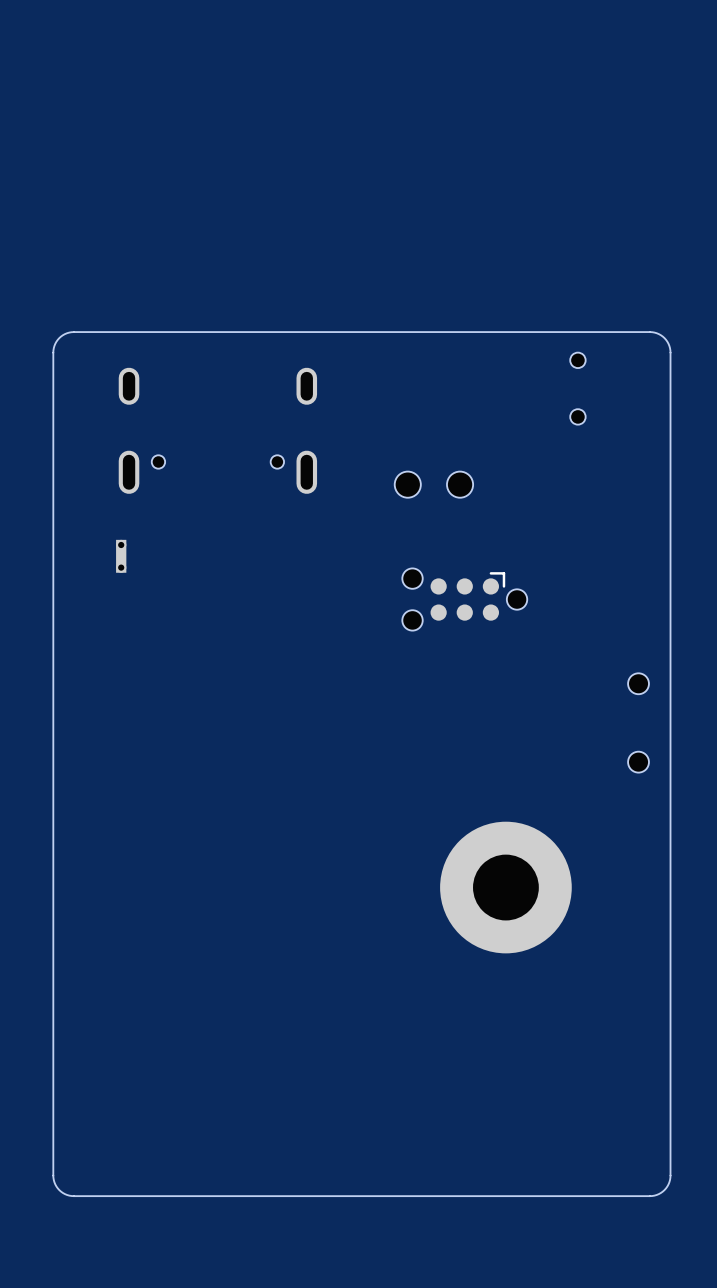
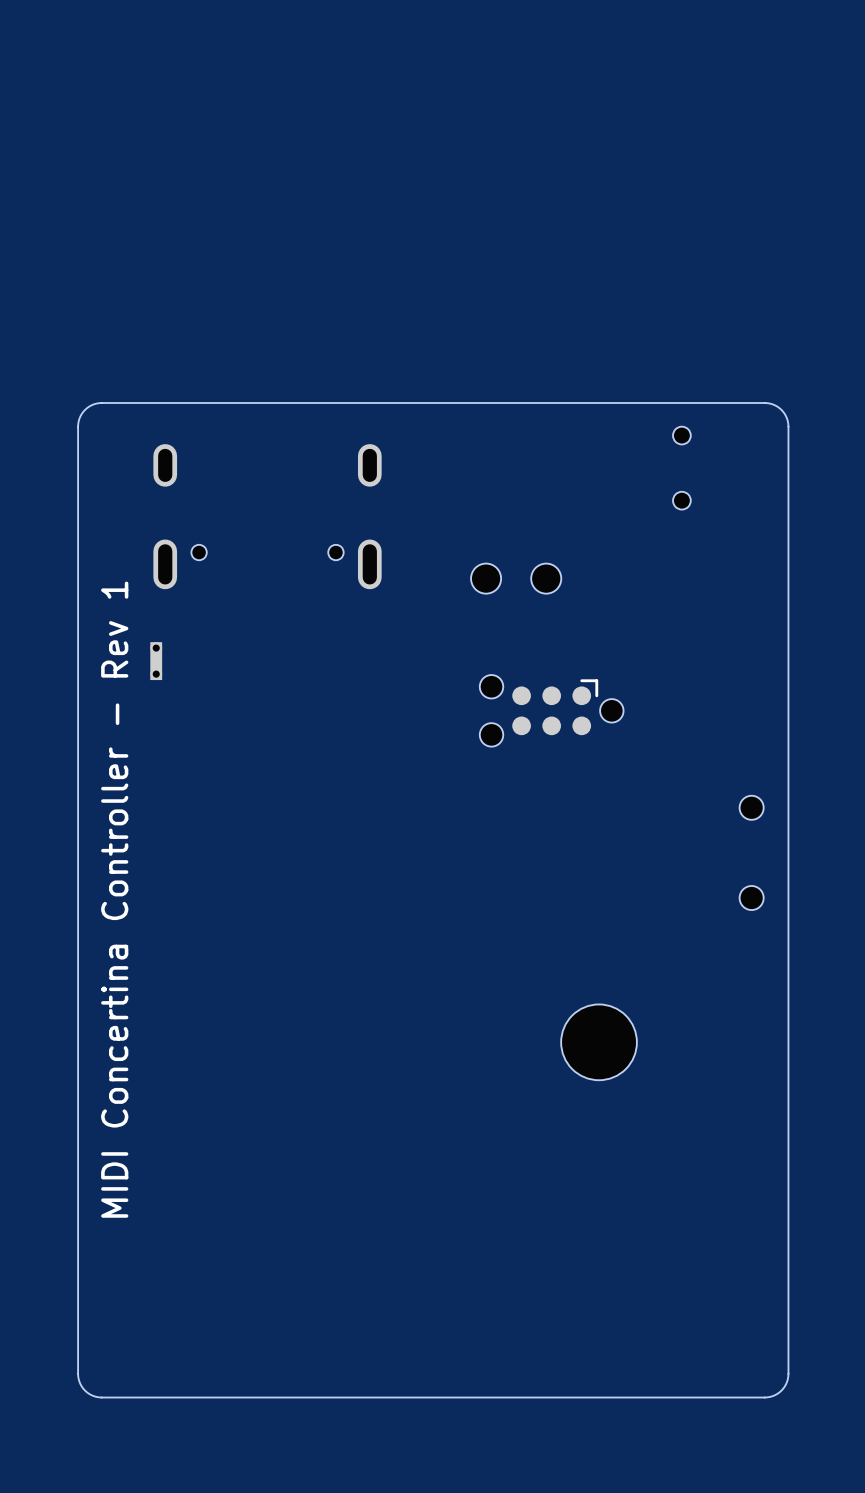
text: none -> MIDI Concertina Controller - Rev 1 (114, 899)
part footprint: [440, 821, 572, 954] -> [561, 1004, 637, 1081]

